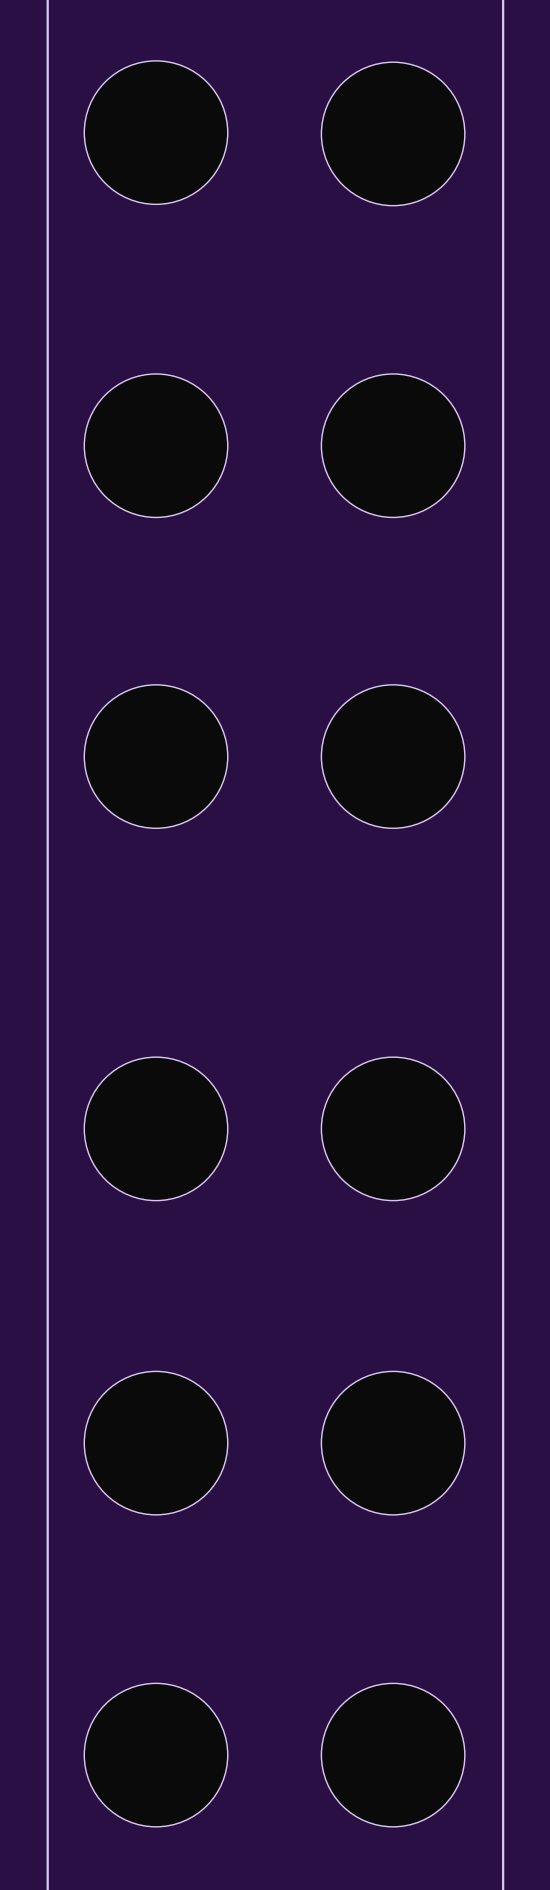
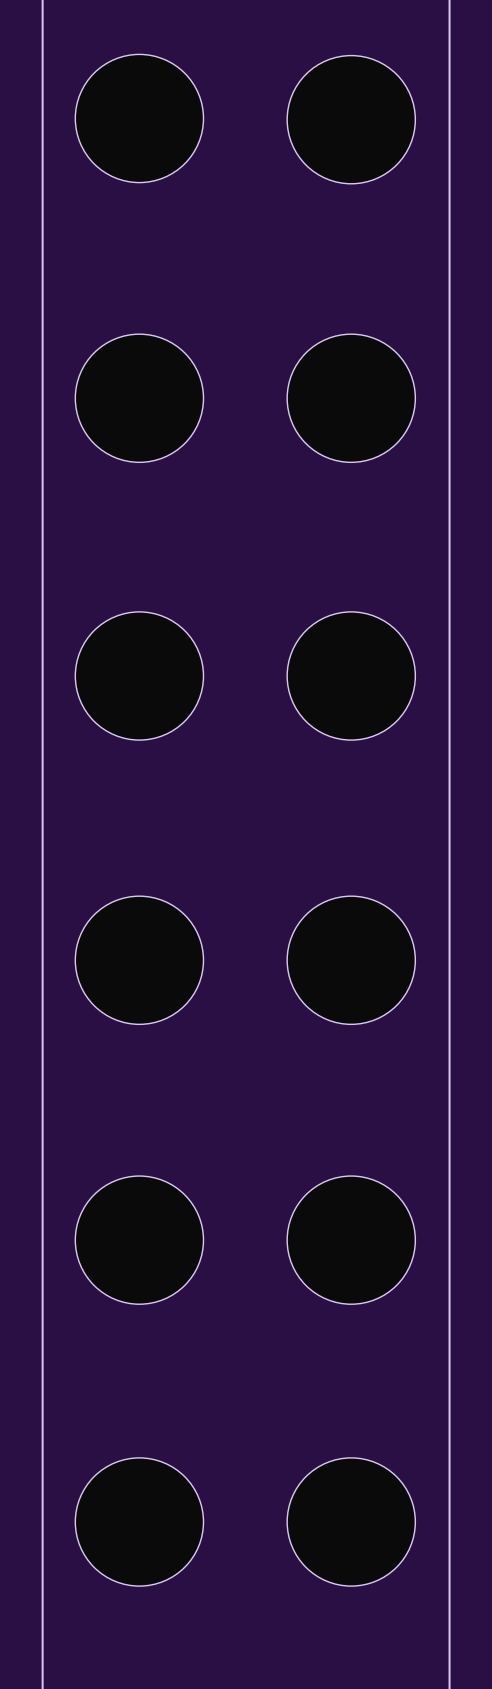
part position: (156, 1128) -> (139, 960)
part position: (393, 1128) -> (351, 960)
part position: (156, 1443) -> (139, 1240)
part position: (393, 1443) -> (351, 1240)
part position: (156, 1755) -> (139, 1521)
part position: (393, 1755) -> (351, 1521)

